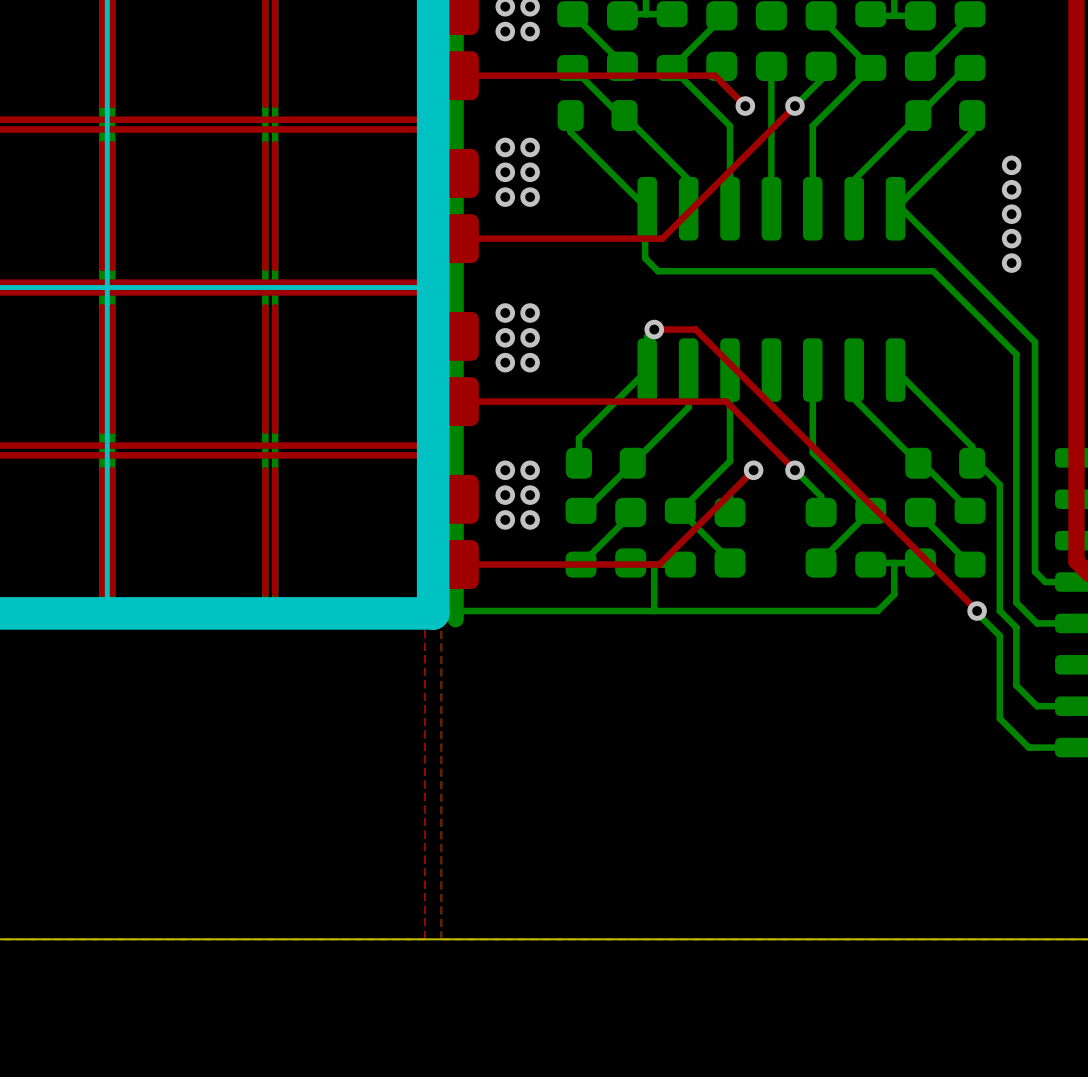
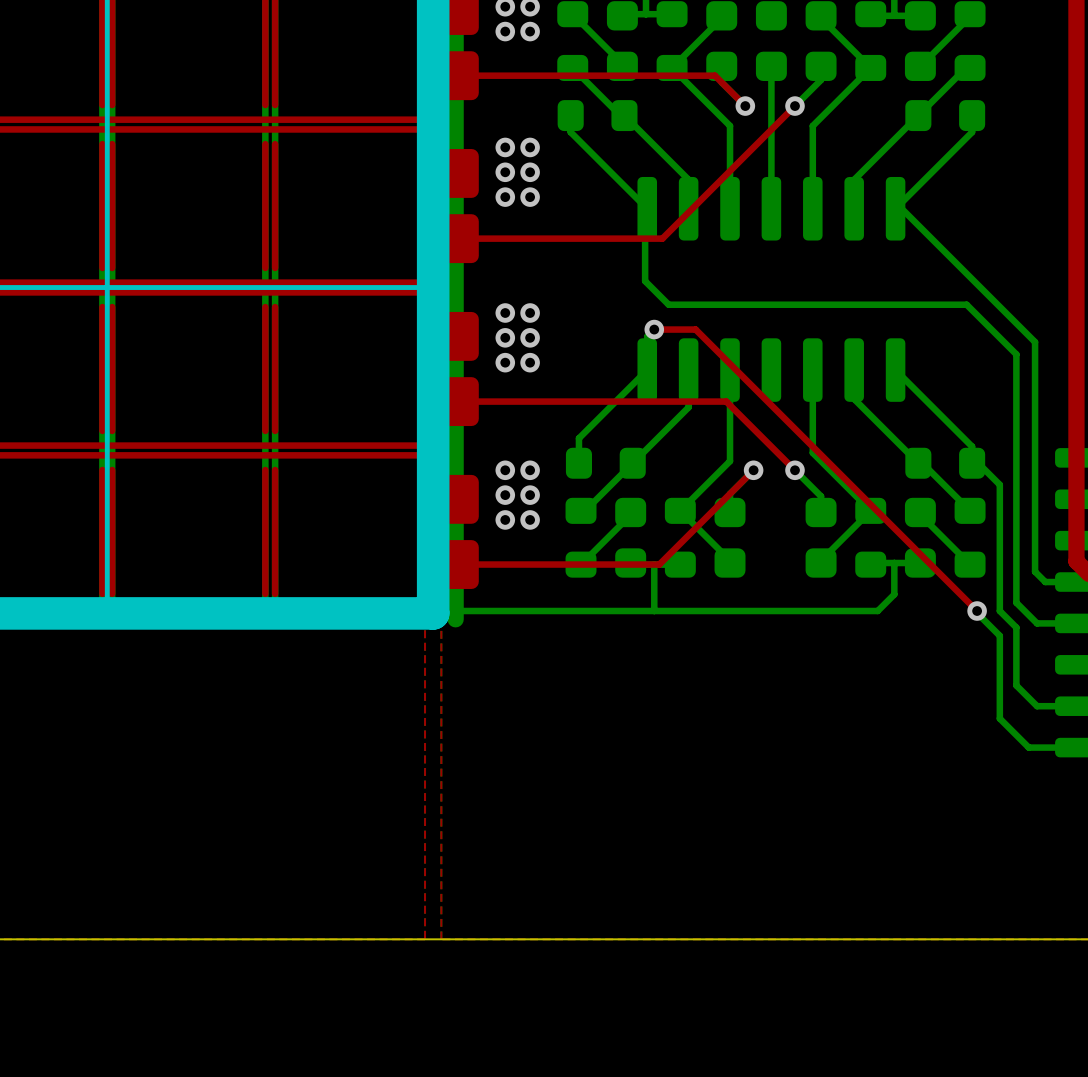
via: (1011, 165) -> none
via: (1011, 189) -> none
via: (1011, 214) -> none
via: (1011, 238) -> none
bottom track: (645, 258) (658, 271) (933, 271) (966, 304) -> (645, 258) (645, 281) (668, 304) (966, 304)
via: (1011, 263) -> none

